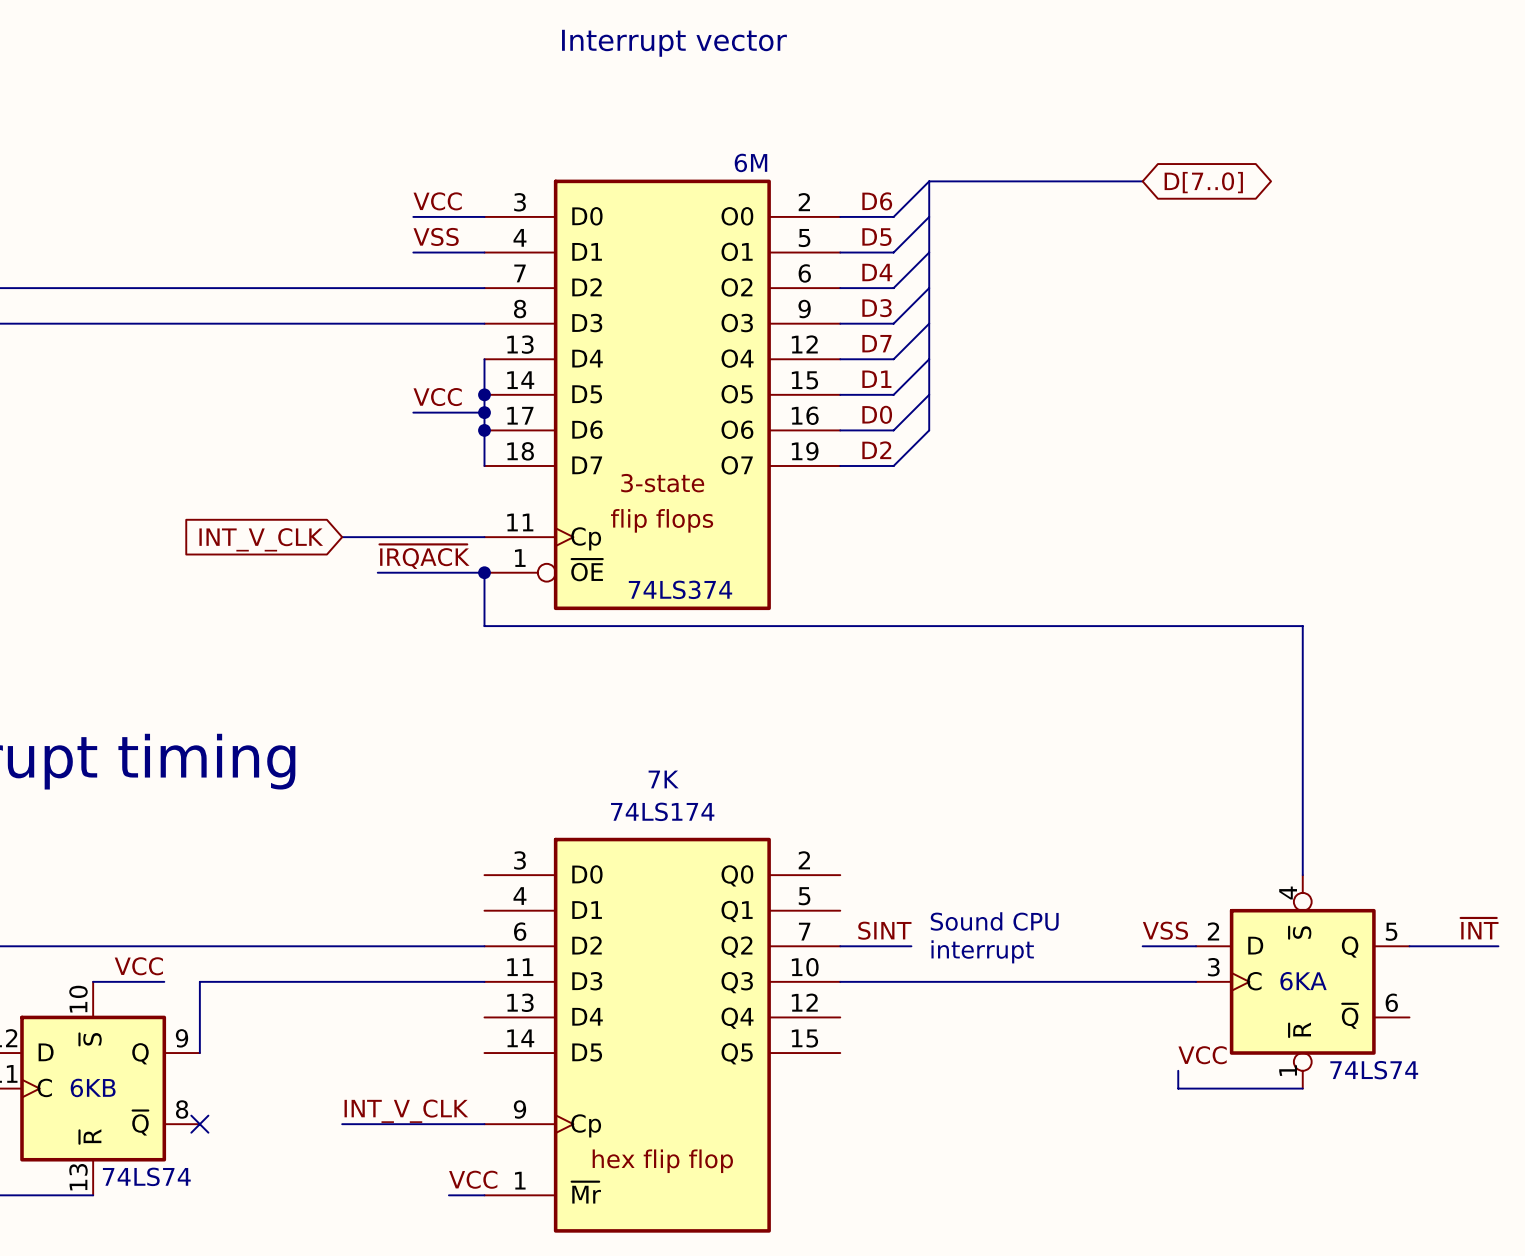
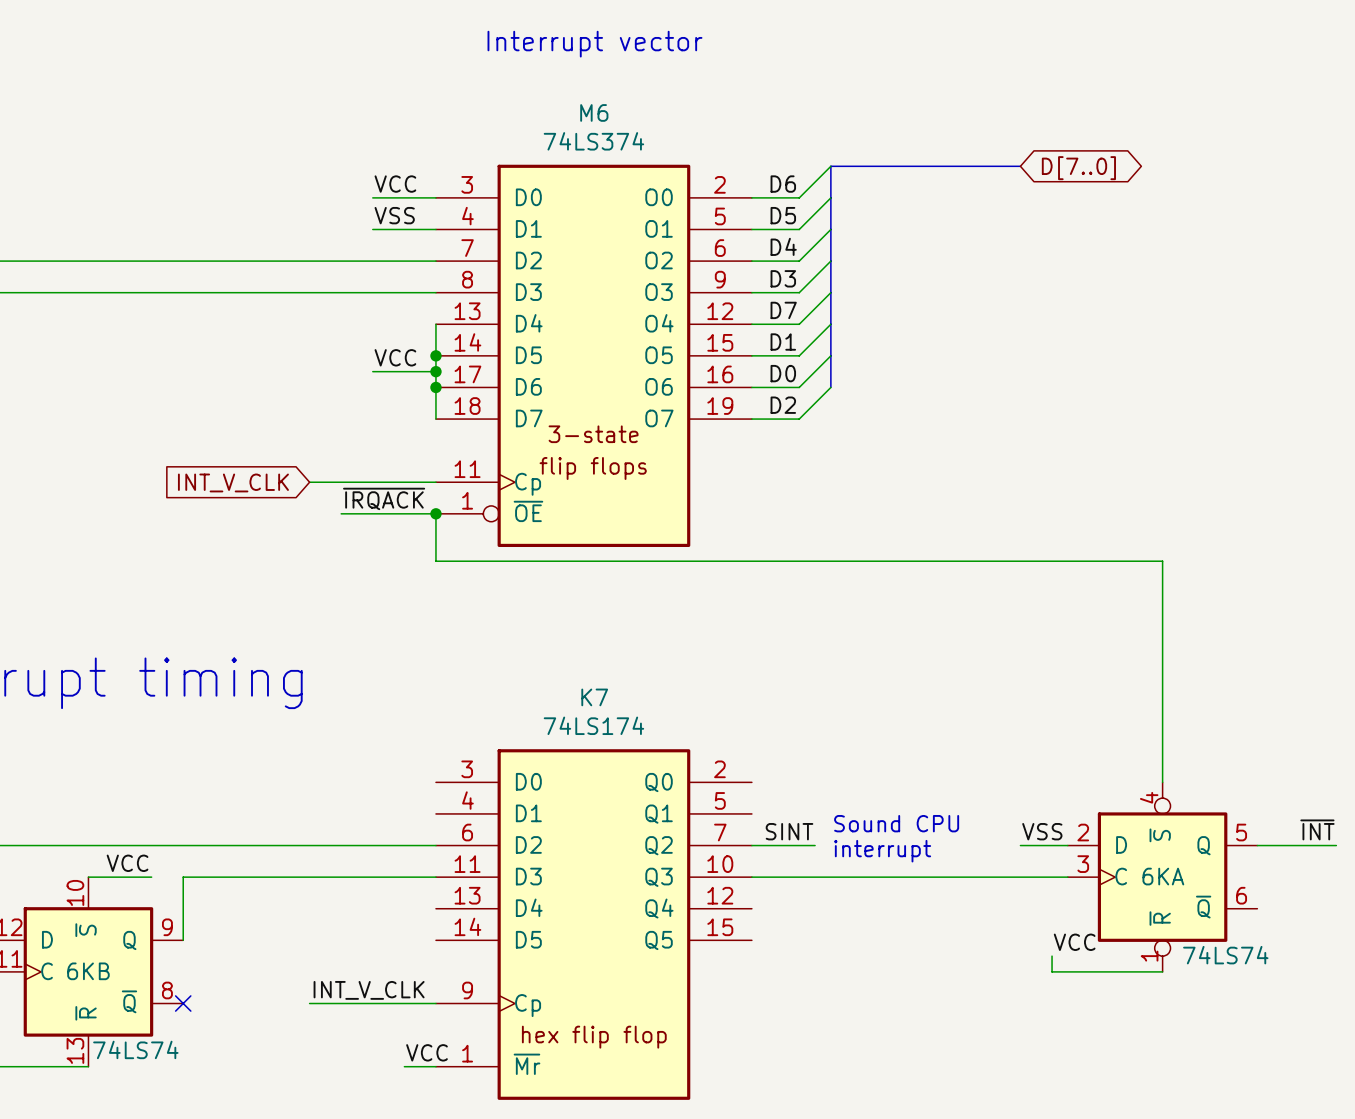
6M name: 6M (750, 162) -> M6 (594, 112)
6M value position: 74LS374 (680, 589) -> 74LS374 (593, 141)
7K name: 7K (663, 779) -> K7 (594, 697)

